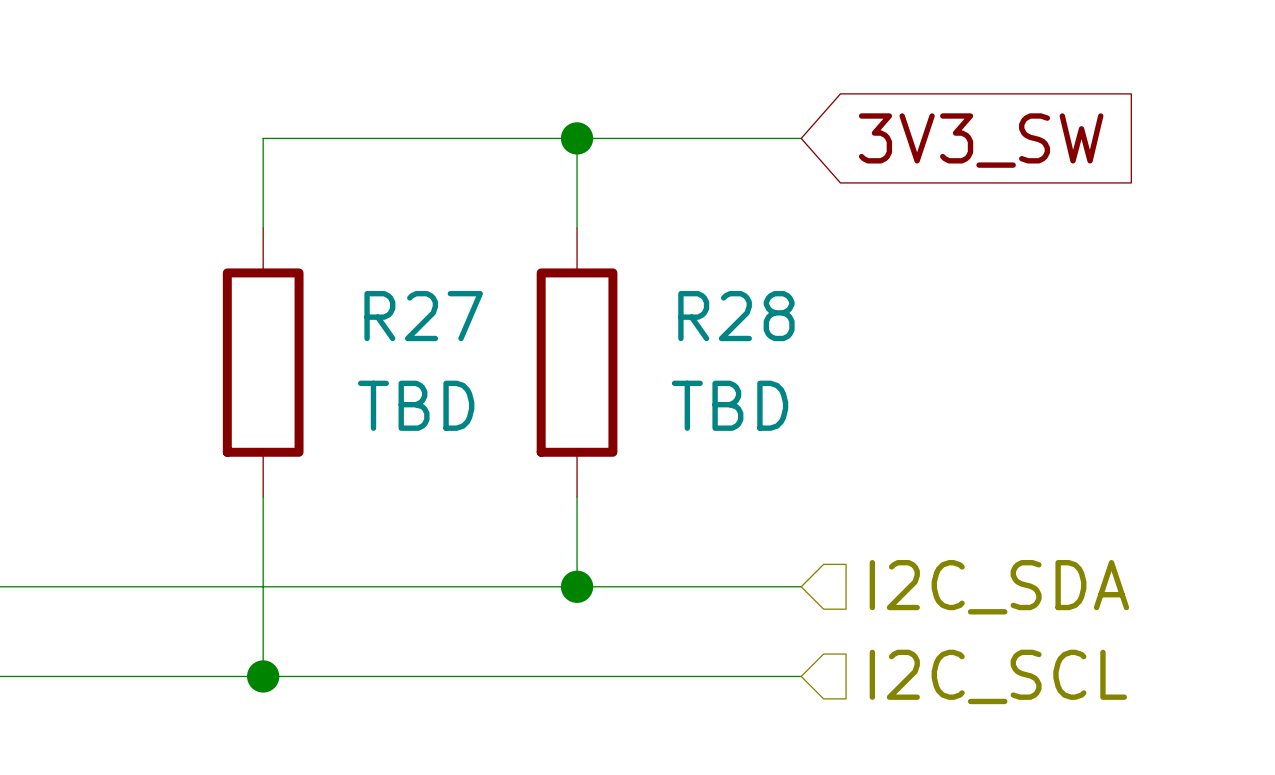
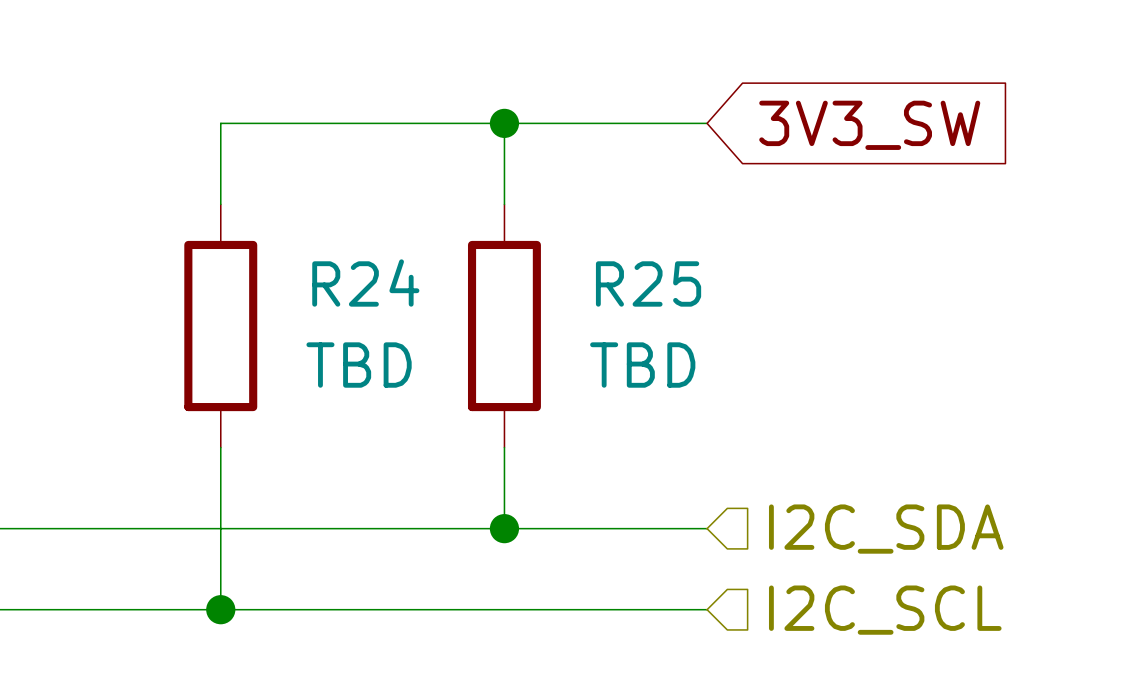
R27 name: R27 (423, 316) -> R24 (365, 283)
R28 name: R28 (736, 316) -> R25 (648, 283)

